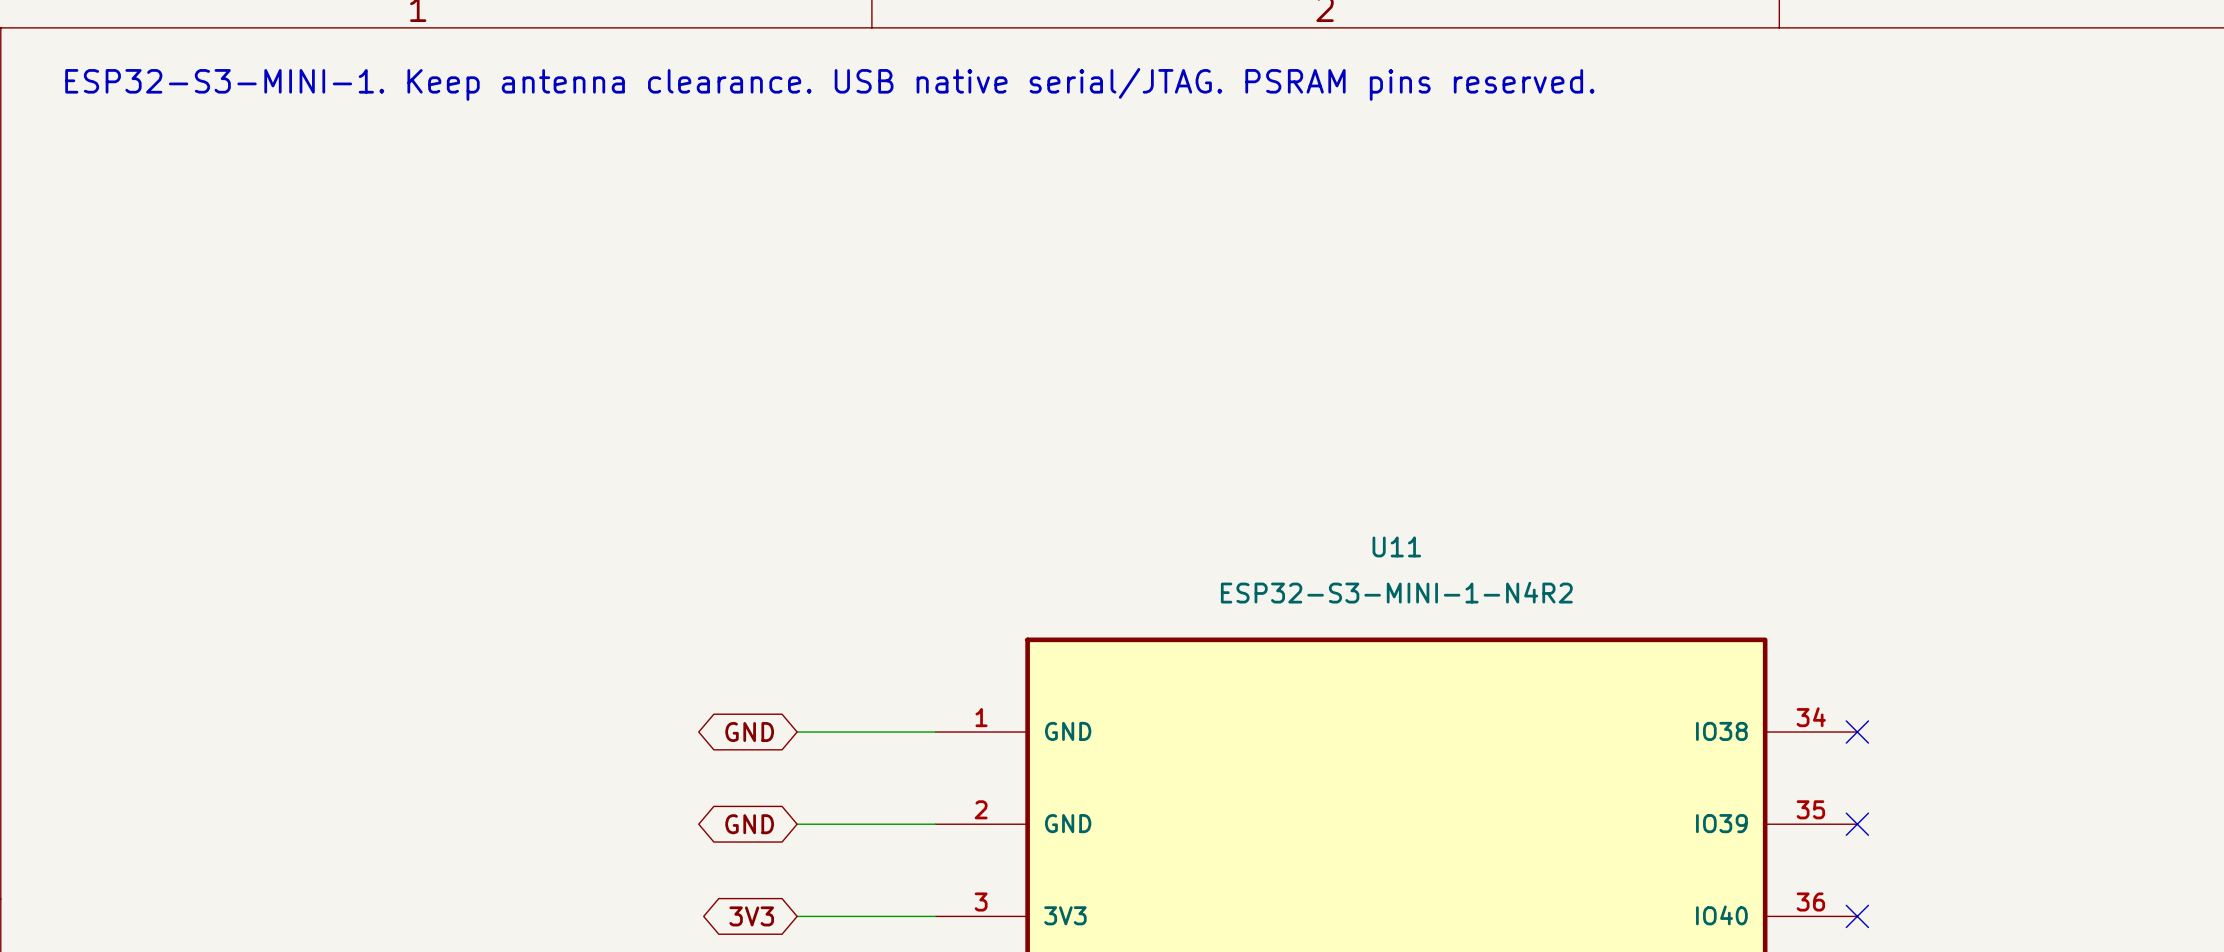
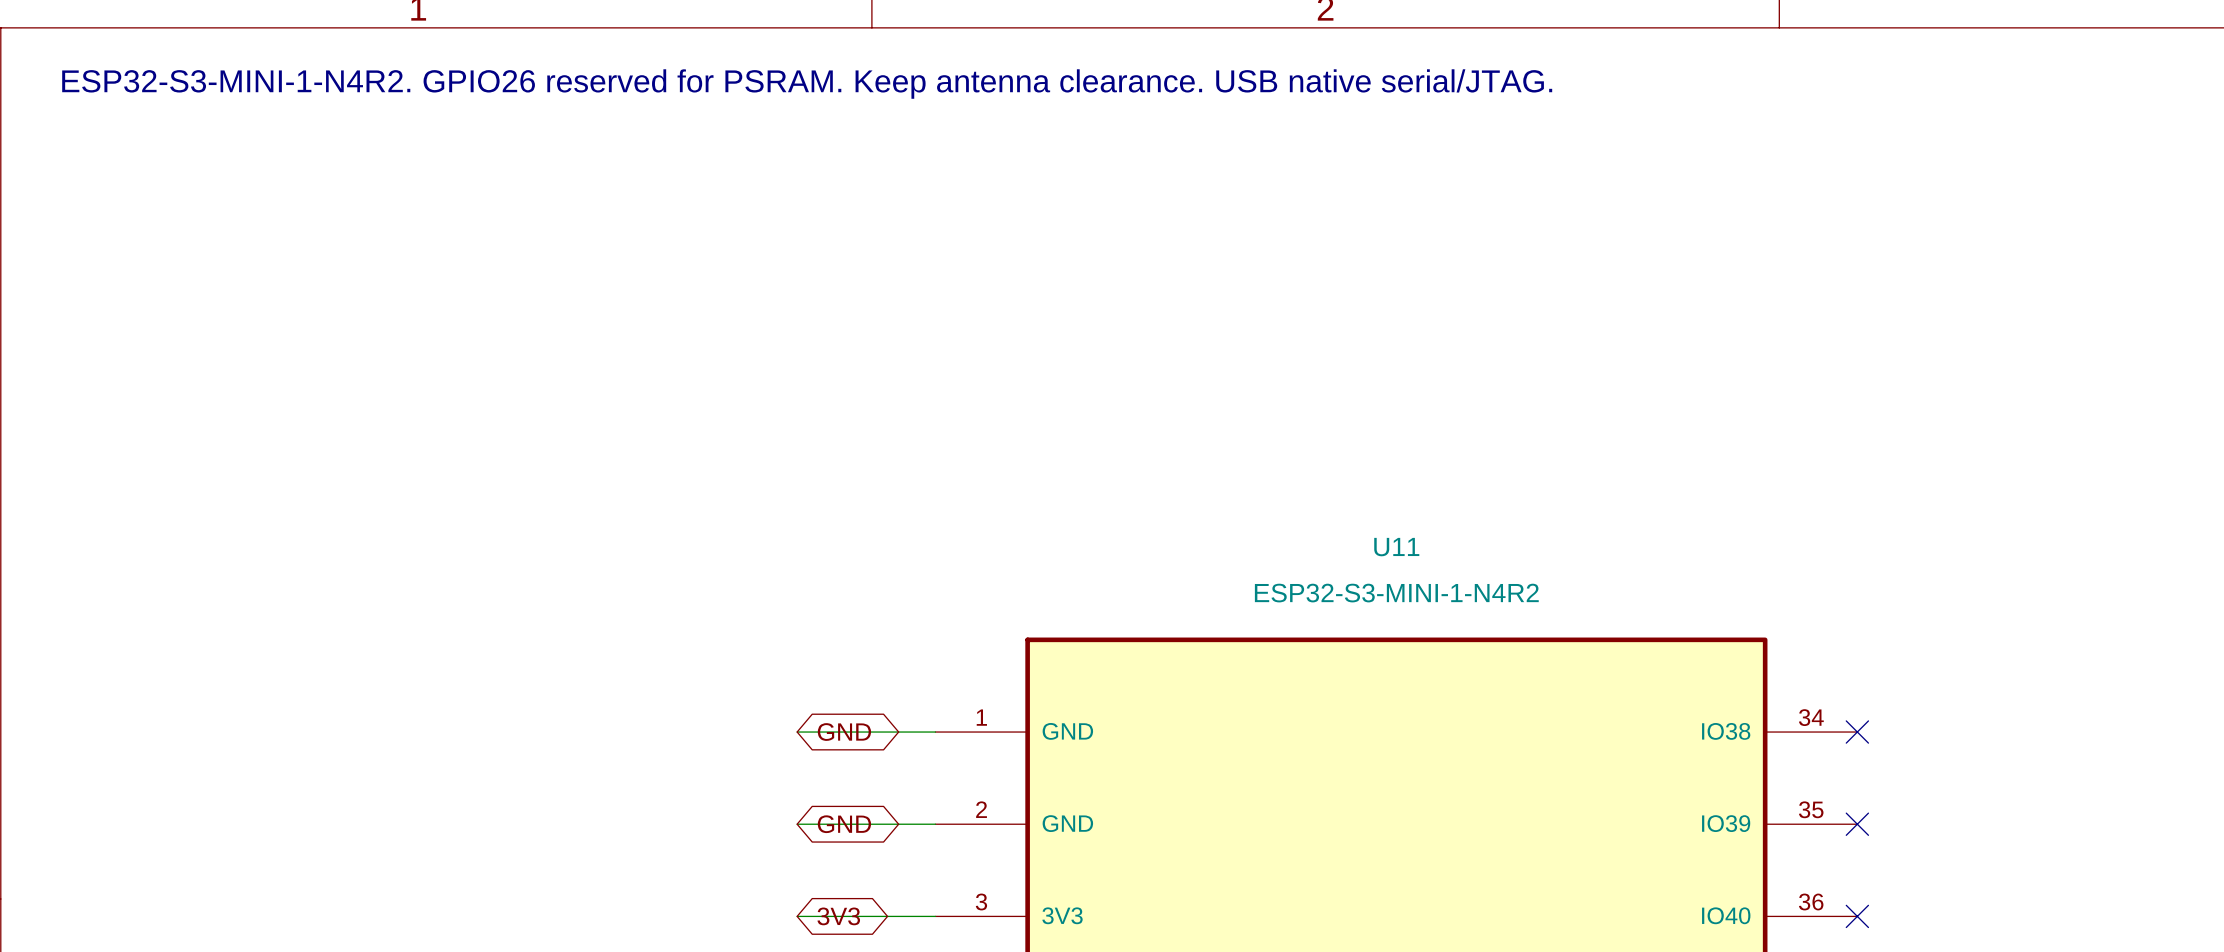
text: ESP32-S3-MINI-1. Keep antenna clearance. USB native serial/JTAG. PSRAM pins reserved. (829, 84) -> ESP32-S3-MINI-1-N4R2. GPIO26 reserved for PSRAM. Keep antenna clearance. USB native serial/JTAG. (807, 84)
global label rotation: 0° (749, 732) -> 180° (844, 732)
global label position: GND (749, 732) -> GND (844, 732)
global label rotation: 0° (749, 824) -> 180° (844, 824)
global label position: GND (749, 824) -> GND (844, 824)
global label rotation: 0° (751, 916) -> 180° (838, 916)
global label position: 3V3 (751, 916) -> 3V3 (838, 916)

